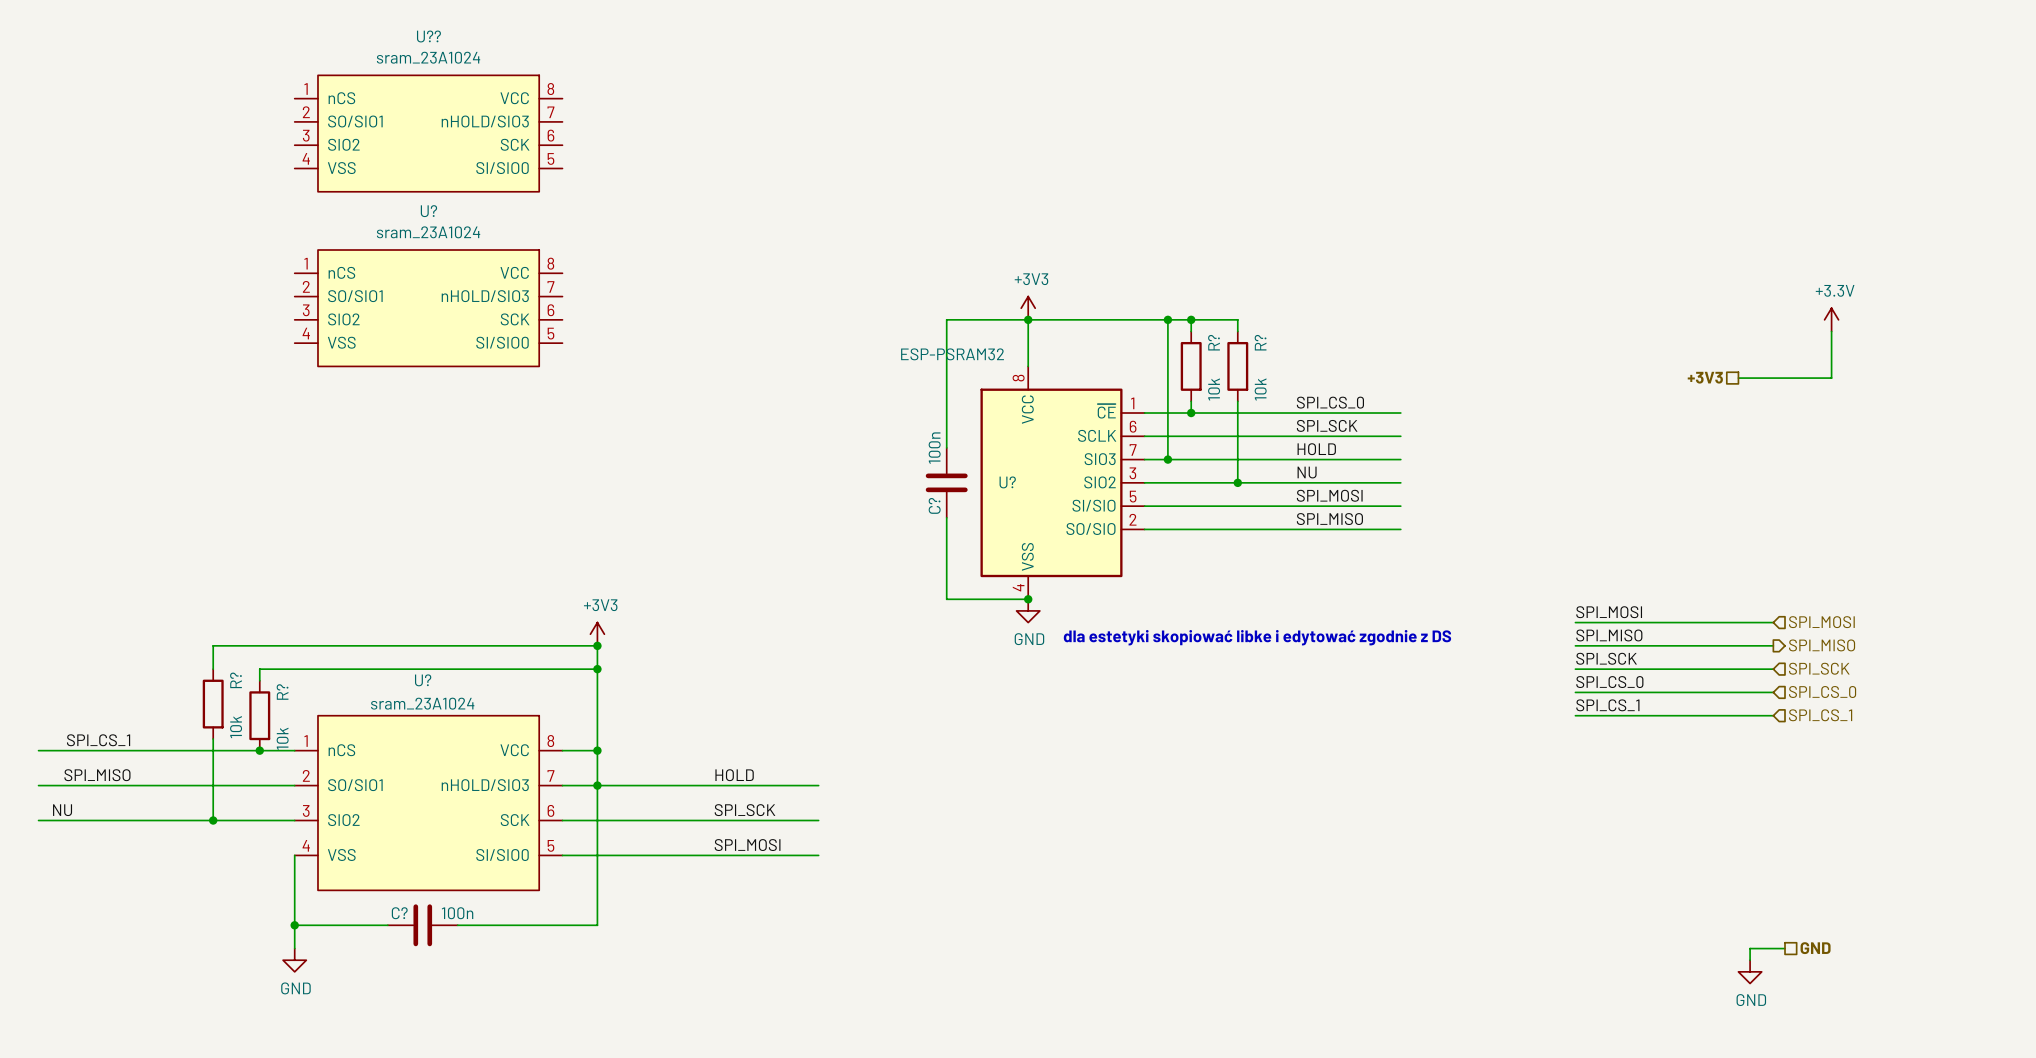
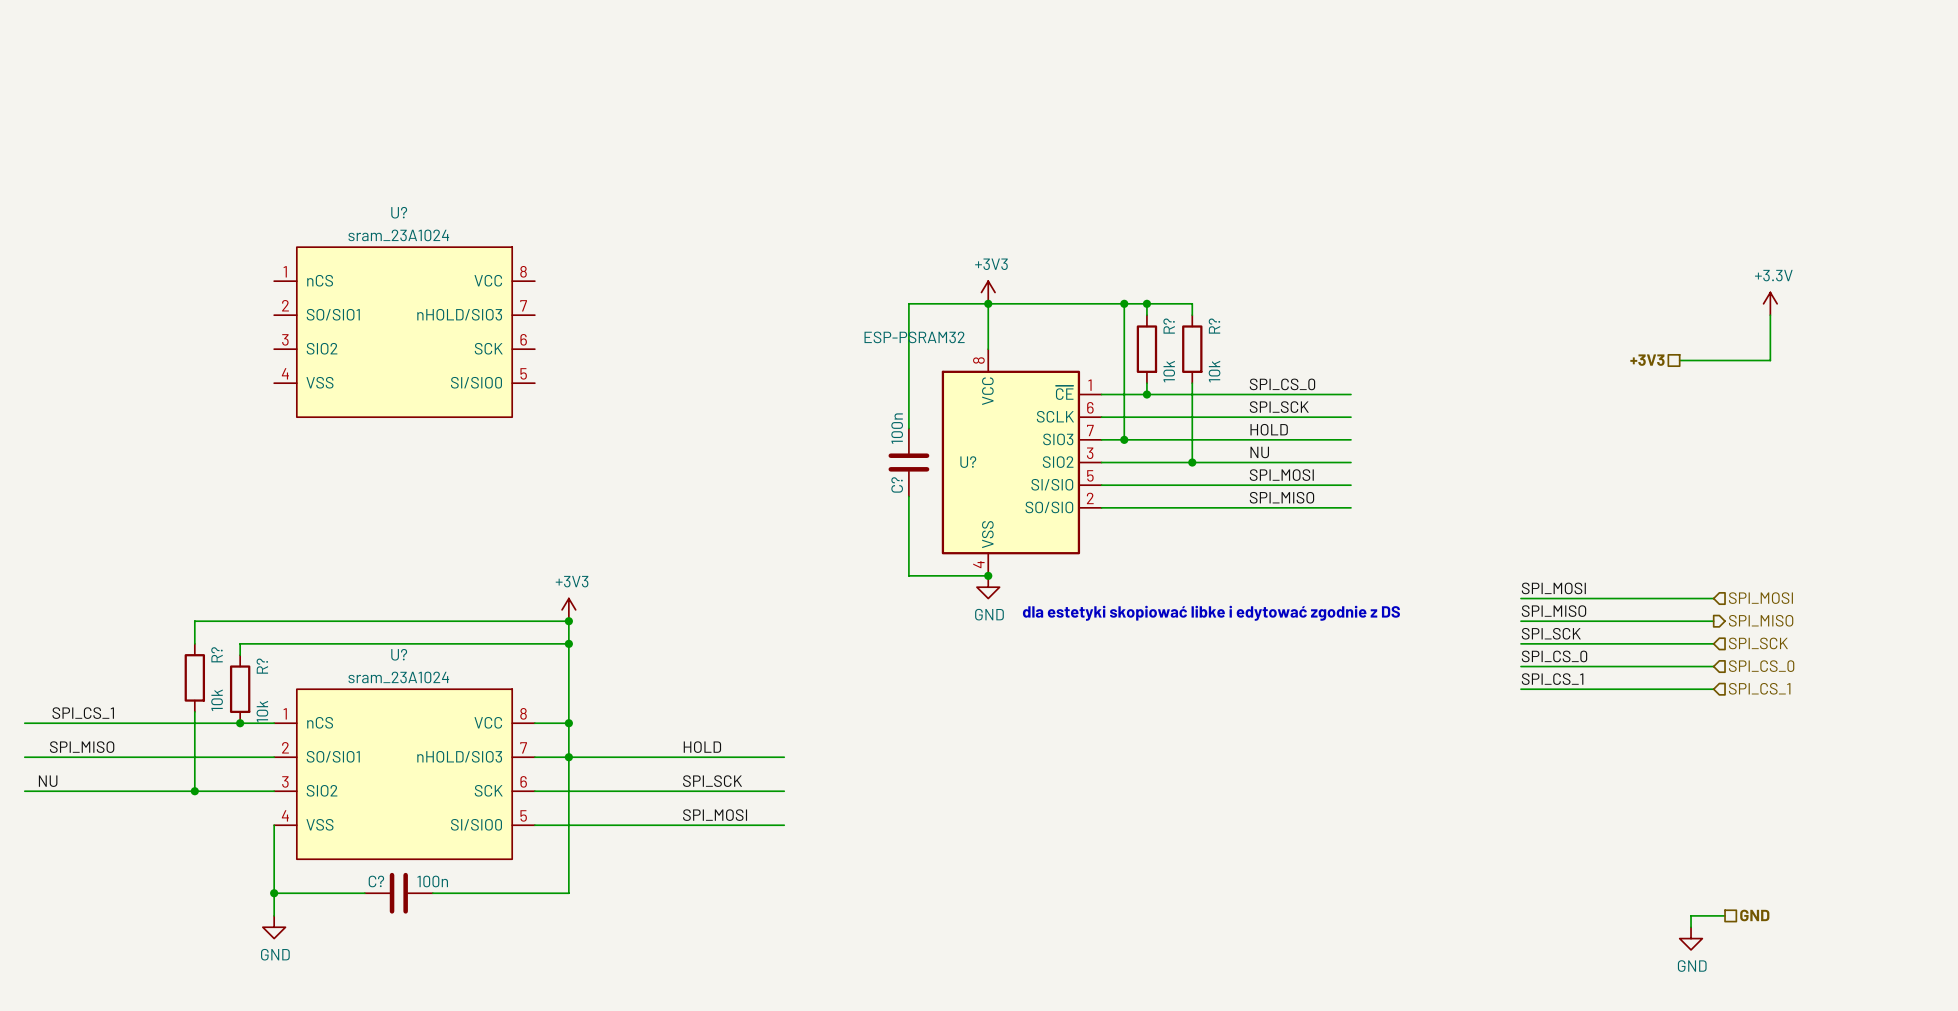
U??: sram_23A1024 (428, 133) -> none
U?: sram_23A1024 (428, 308) -> none
U?: none -> sram_23A1024 (404, 332)

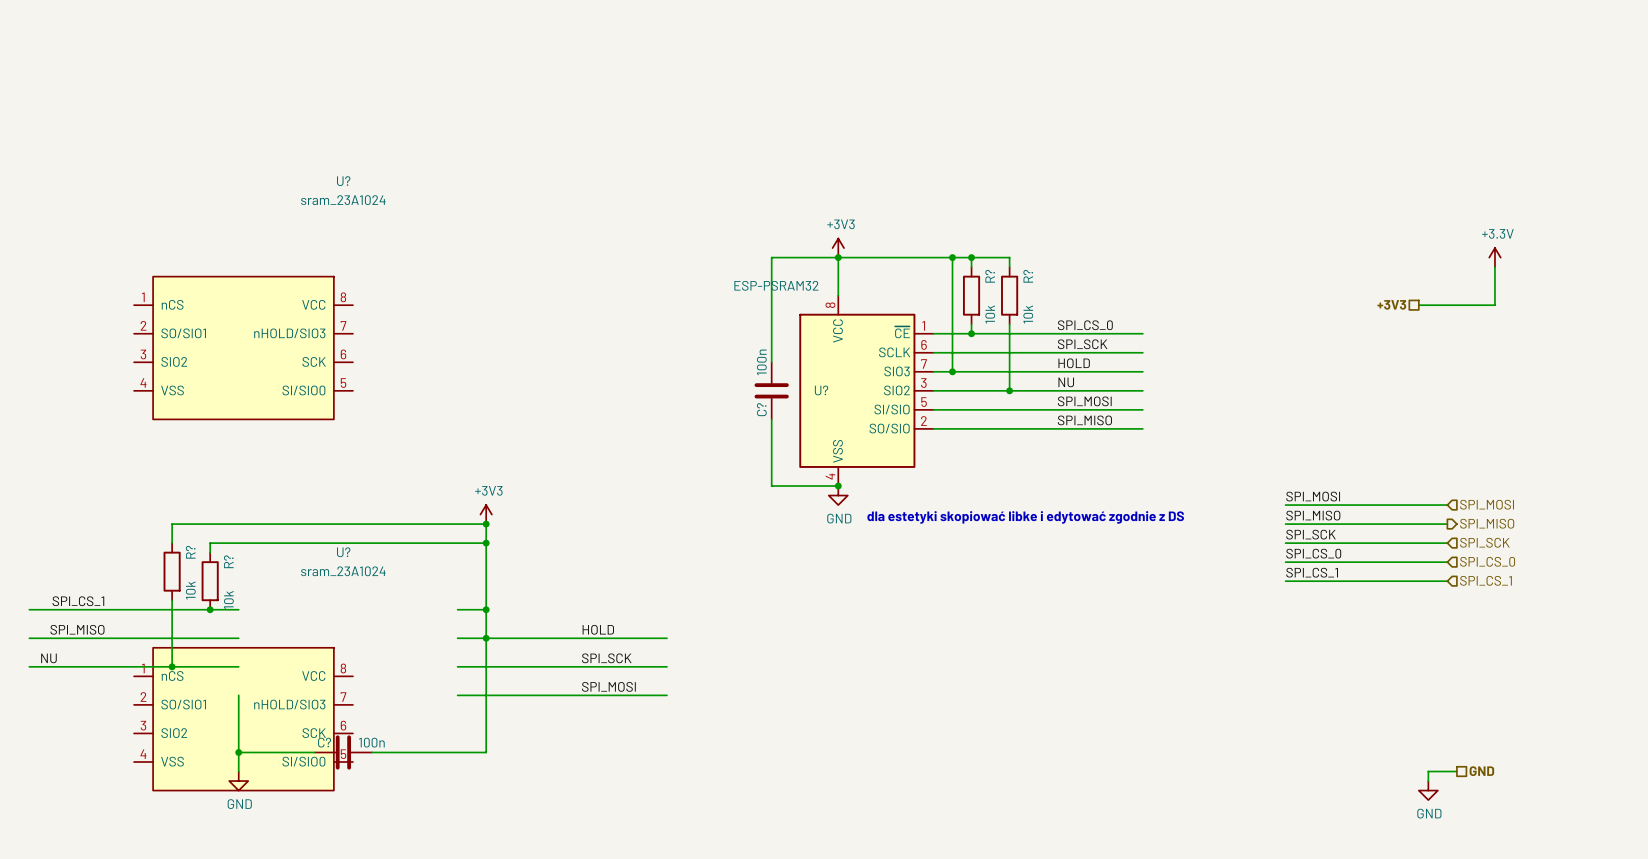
U? position: (404, 332) -> (243, 348)
U? position: (404, 774) -> (243, 719)

